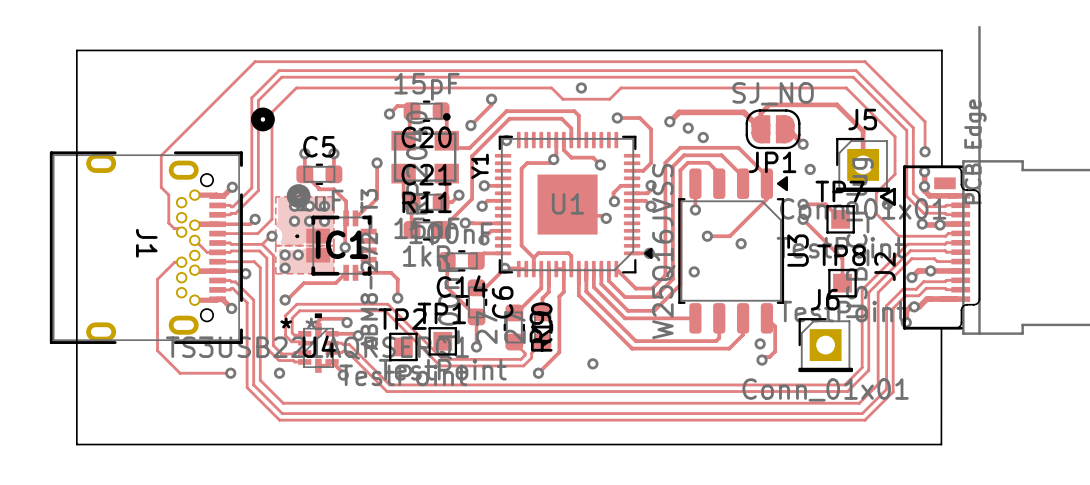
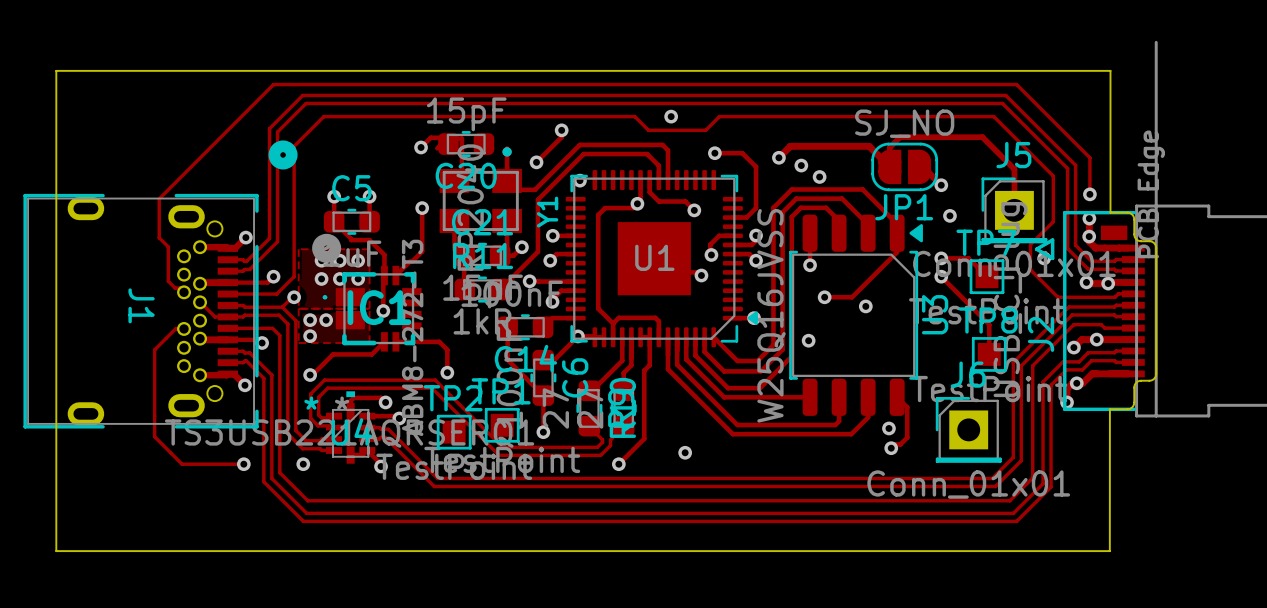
track: none -> (445, 137) (430, 137) (421, 147)
C20 position: (426, 111) -> (466, 144)
via position: (389, 114) -> (421, 147)

